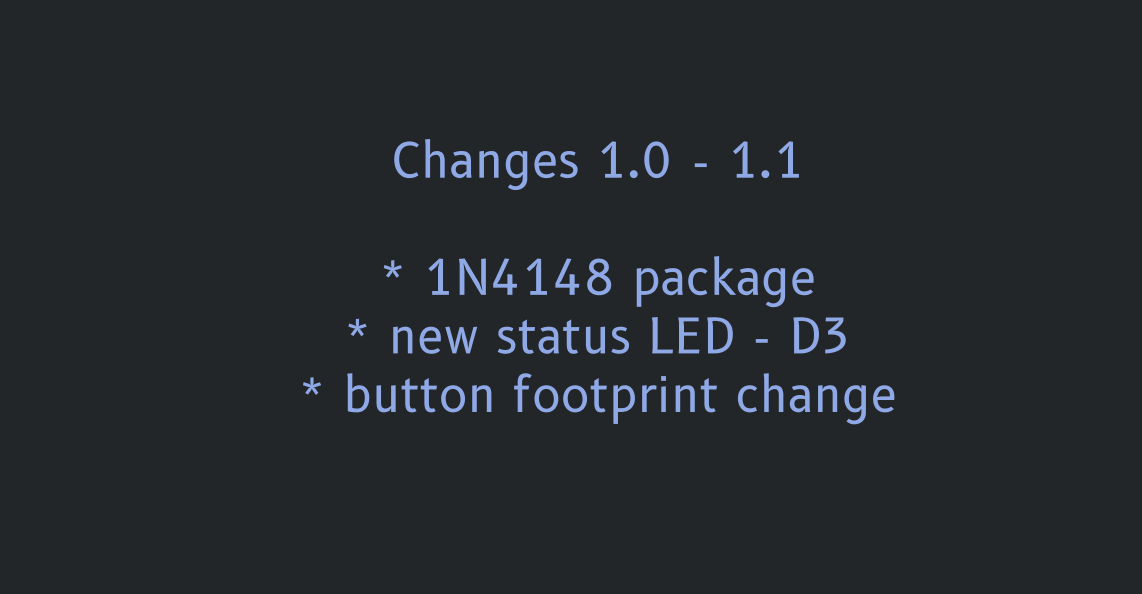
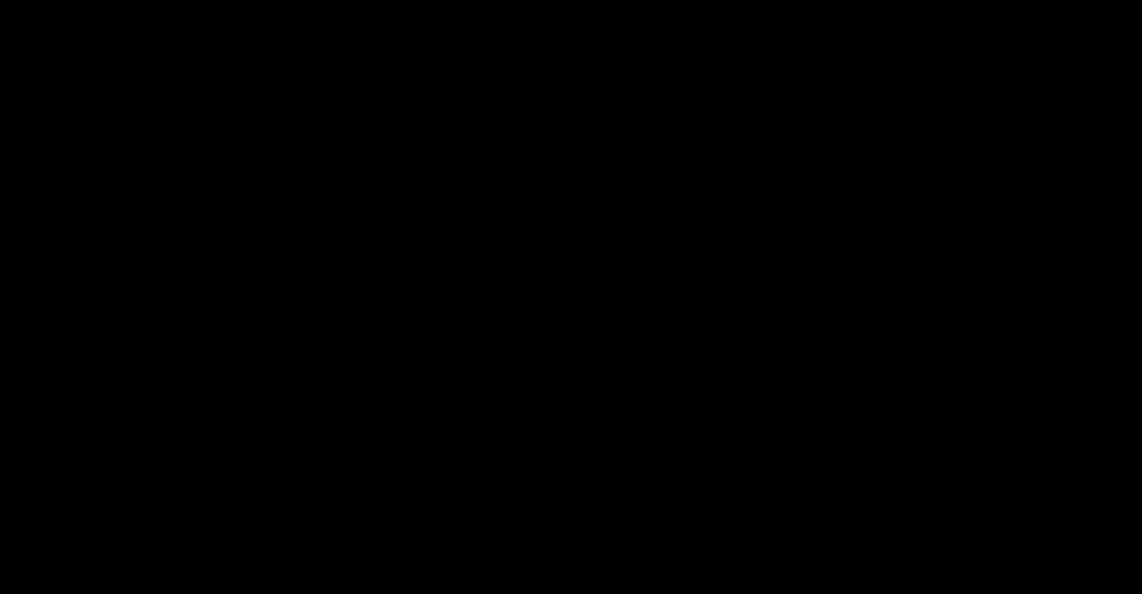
text: Changes 1.0 - 1.1 (596, 164) -> none
text: * 1N4148 package (598, 281) -> none
text: * new status LED - D3 (597, 335) -> none
text: * button footprint change (598, 398) -> none

